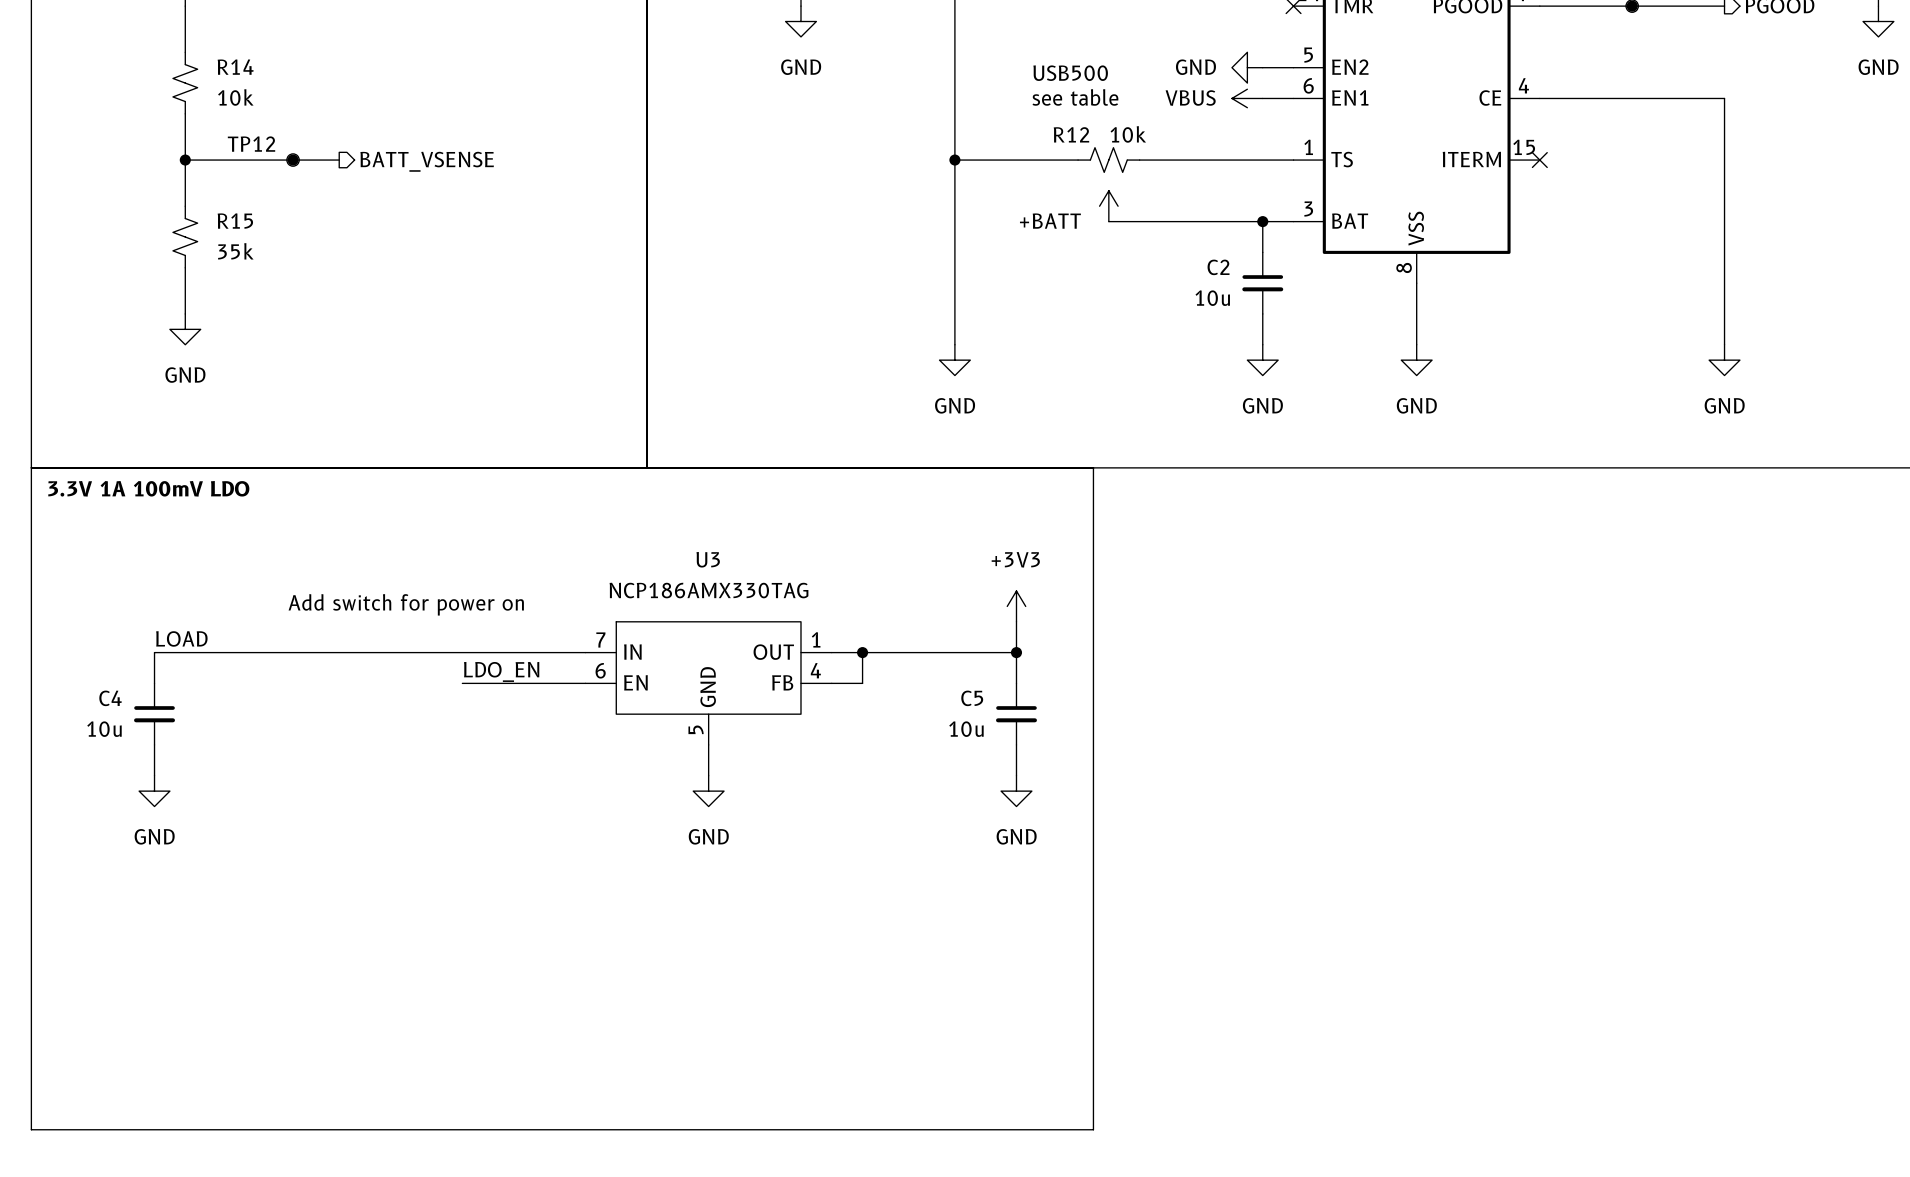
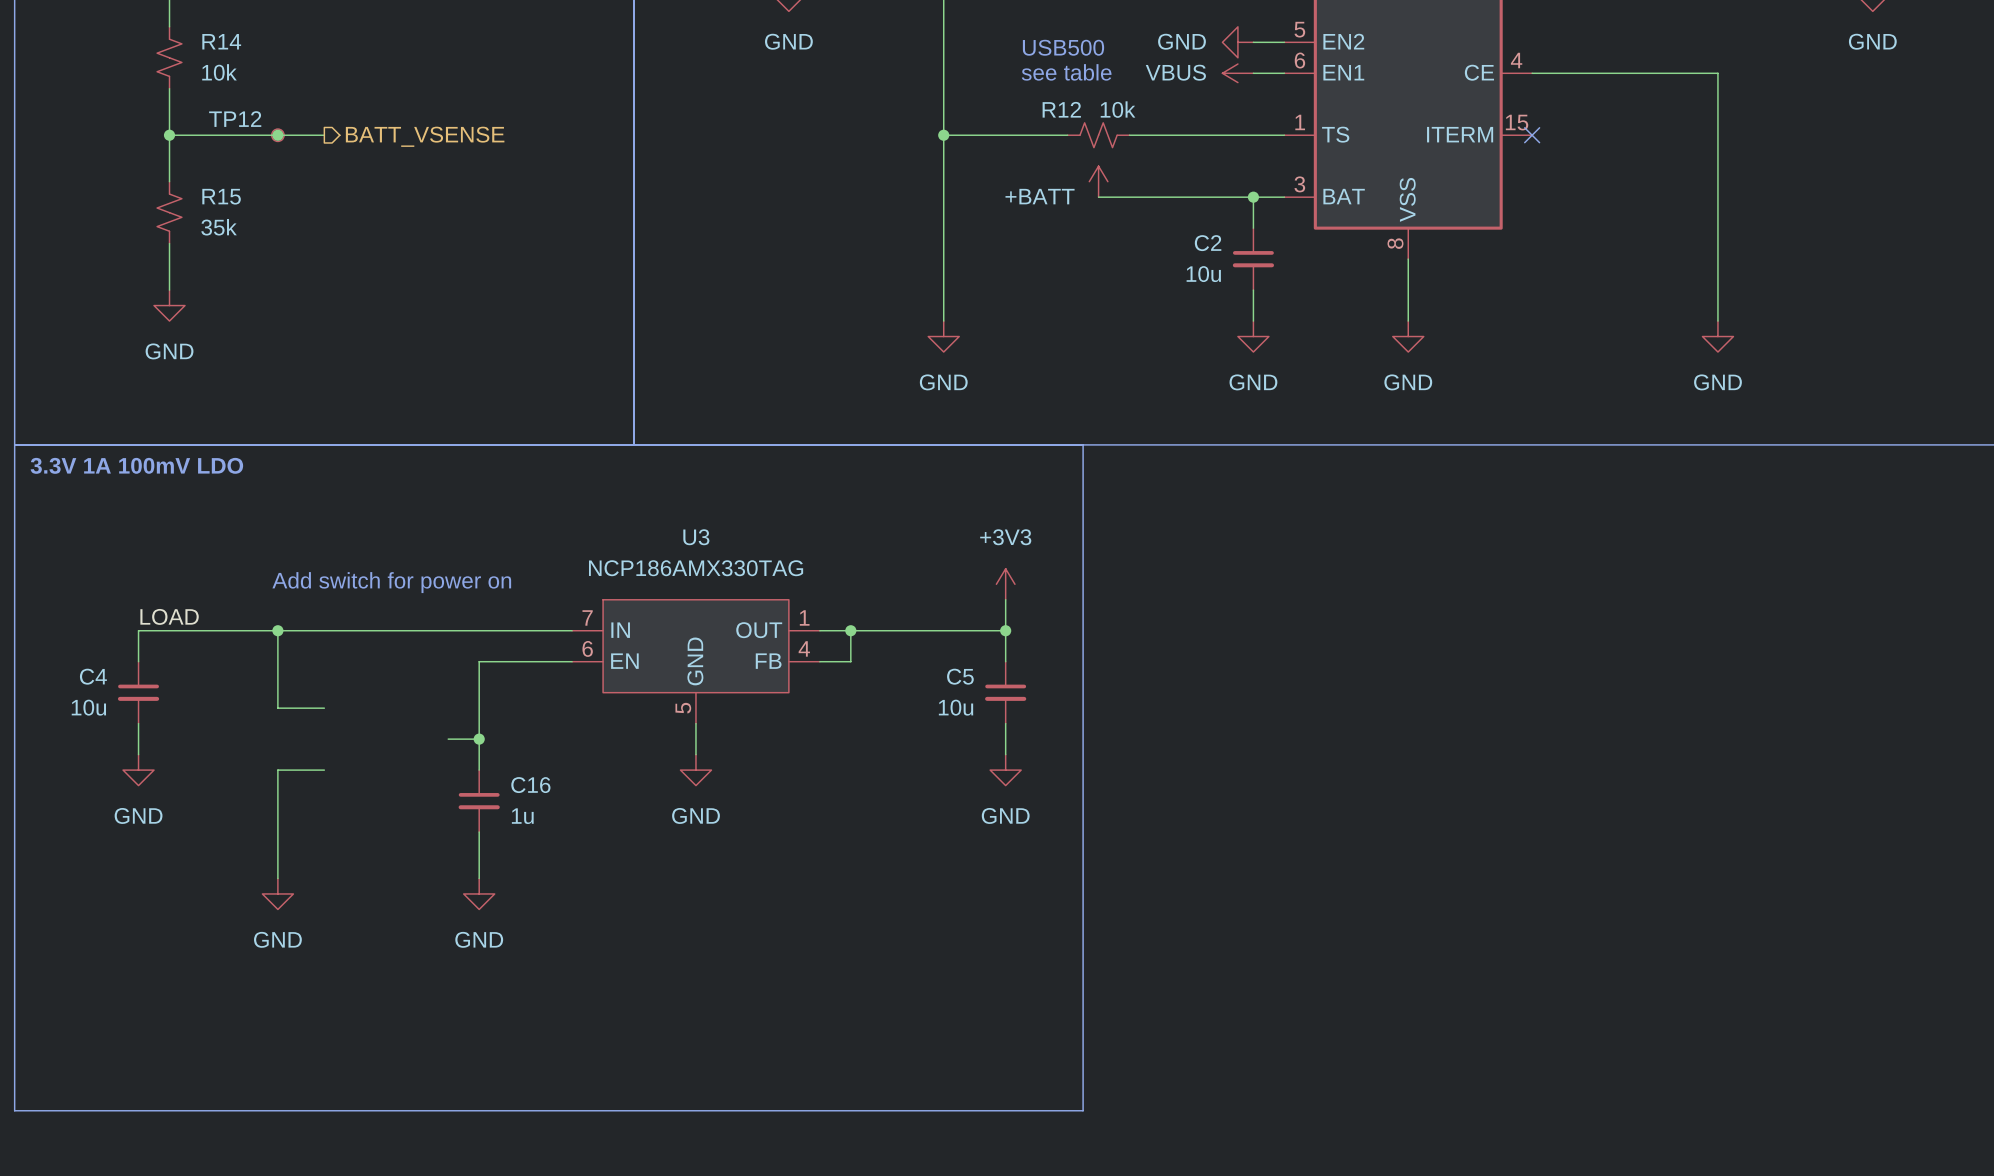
wire: none -> (277, 630) (277, 708) (324, 708)
junction: none -> (277, 630)
label: LDO_EN (501, 671) -> none
wire: (462, 683) (493, 683) -> (479, 770) (479, 661)
wire: none -> (448, 739) (479, 739)
junction: none -> (479, 739)
wire: none -> (324, 770) (277, 770) (277, 878)
C16: none -> 1u (479, 801)
wire: none -> (479, 832) (479, 878)
power symbol: none -> GND (277, 893)
power symbol: none -> GND (479, 893)

